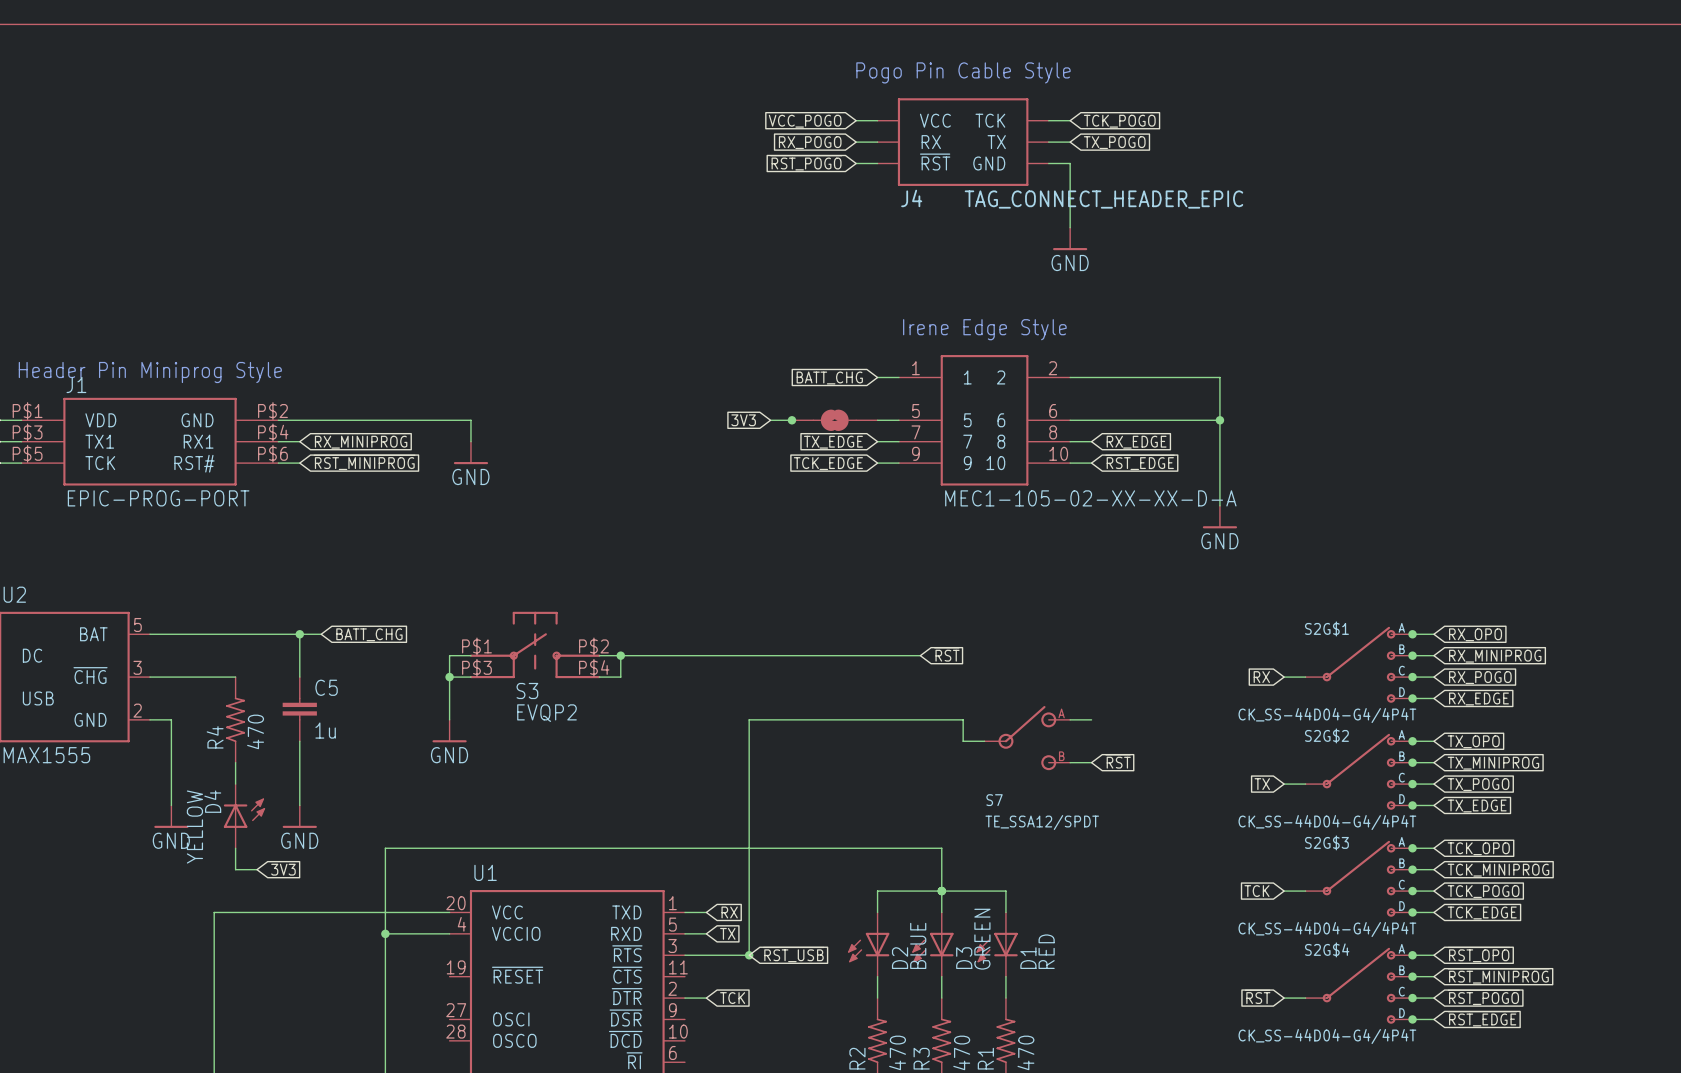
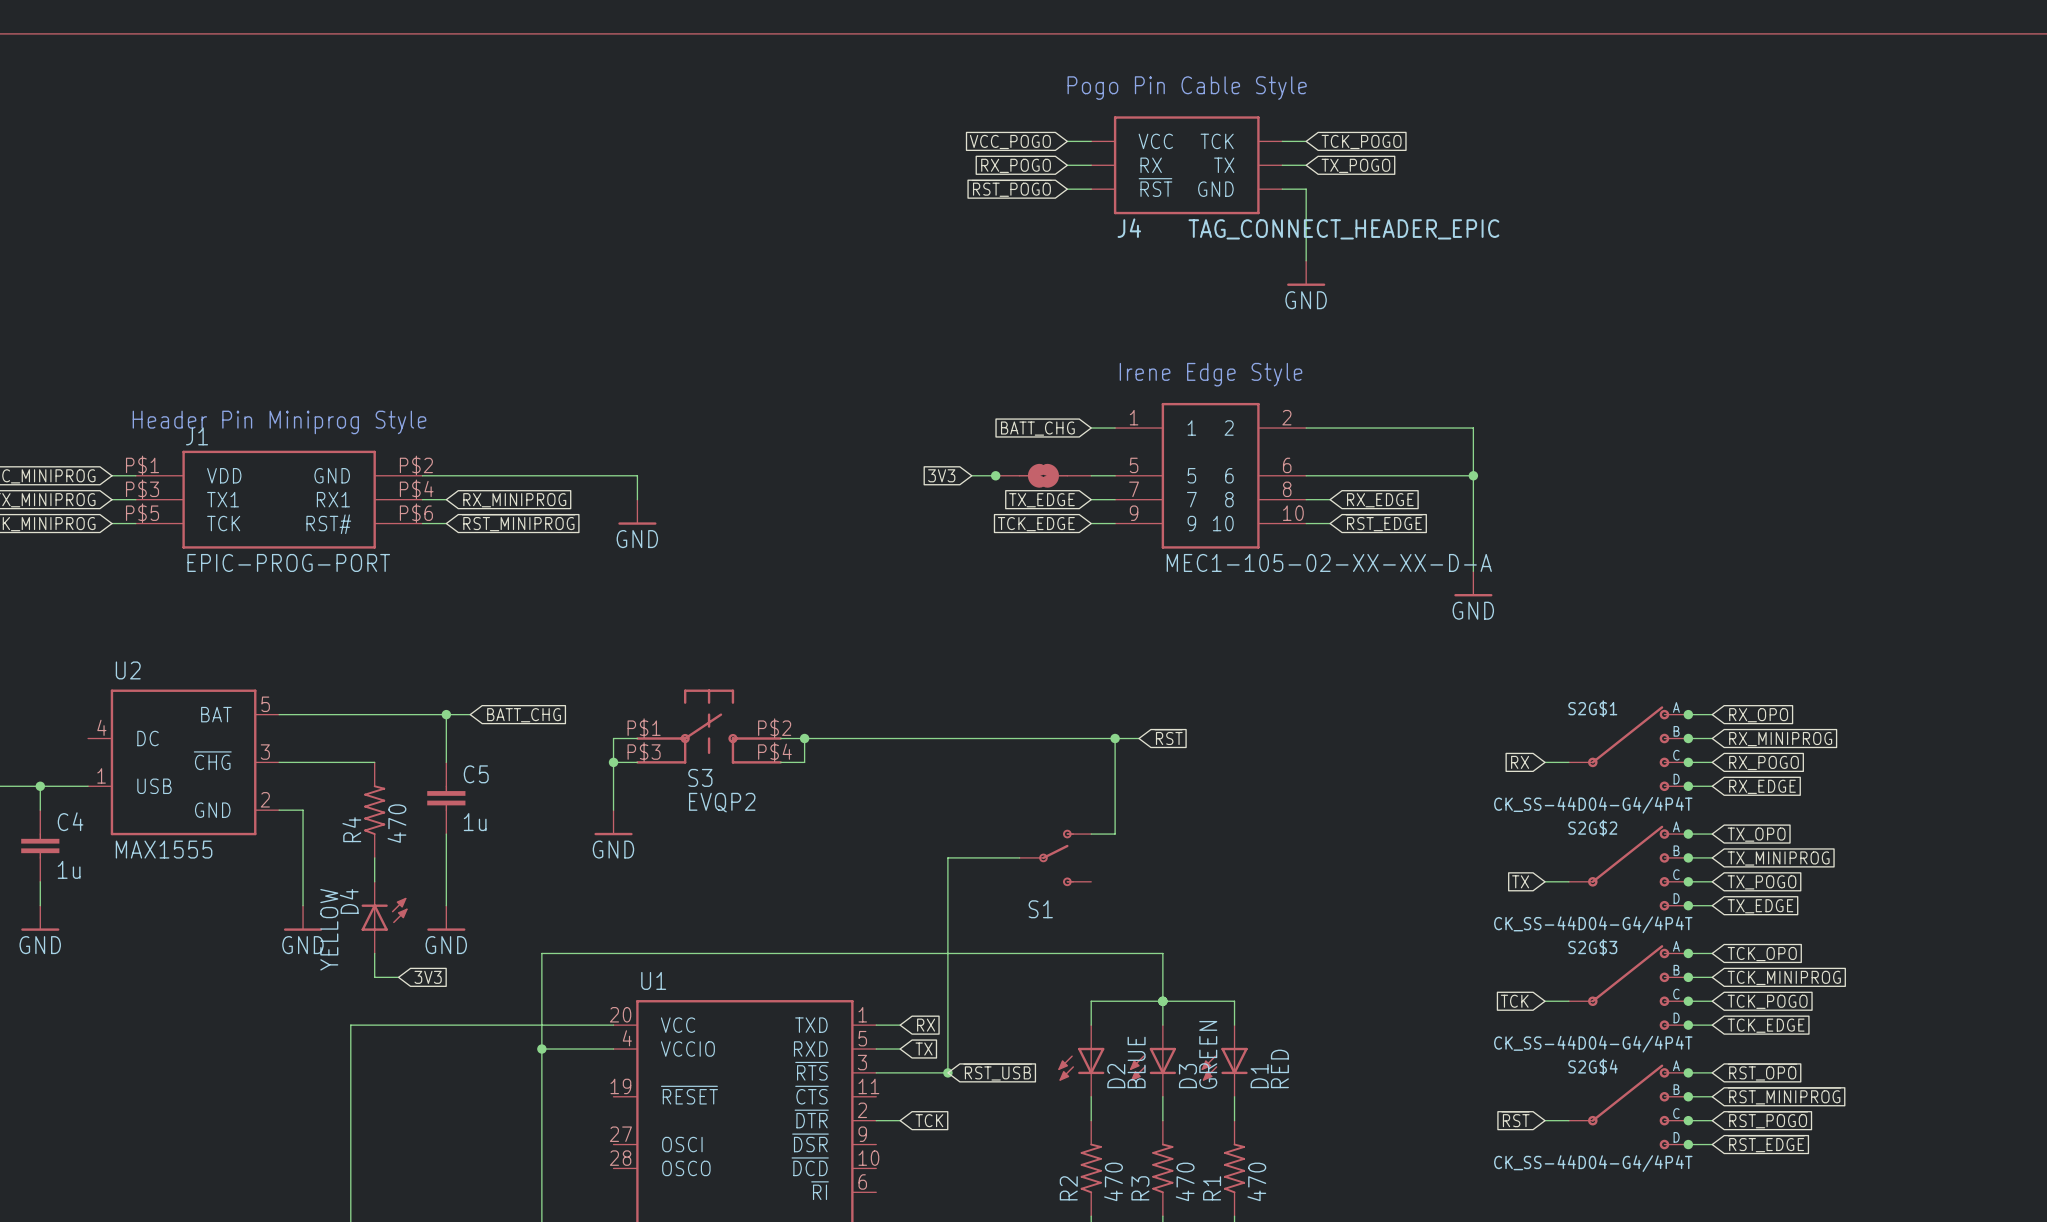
wire: none -> (1115, 738) (1115, 834) (1091, 834)
junction: none -> (1115, 738)
wire: (1070, 719) (1091, 719) -> none
S7: TE_SSA12/SPDT (1027, 738) -> none
wire: (984, 741) (963, 741) (963, 719) (749, 719) (749, 762) -> (1019, 857) (947, 857)
global label: ~{RST} (1118, 761) -> none
S1: none -> (1055, 857)
wire: (1070, 762) (1091, 762) -> none

